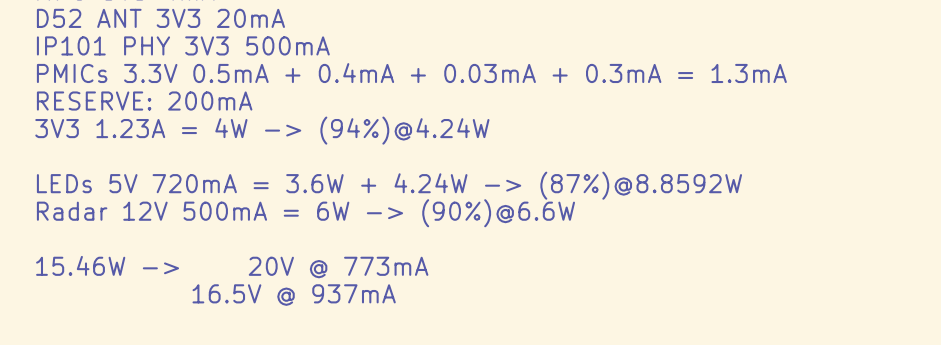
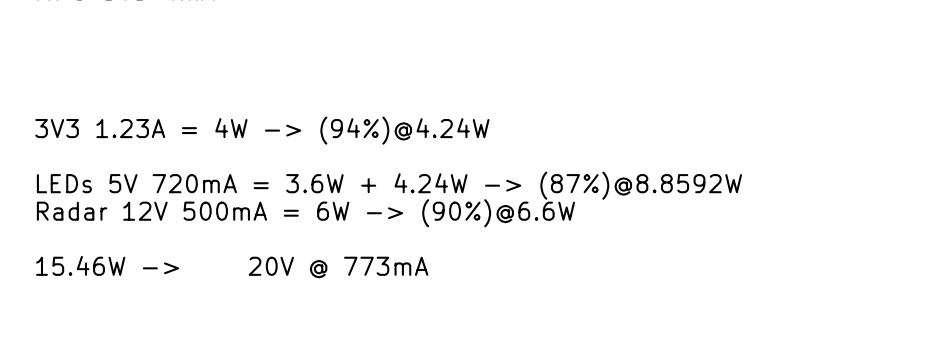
text: D52 ANT 3V3 20mA (160, 18) -> none
text: IP101 PHY 3V3 500mA (183, 45) -> none
text: PMICs 3.3V 0.5mA + 0.4mA + 0.03mA + 0.3mA = 1.3mA (411, 73) -> none
text: RESERVE: 200mA (144, 101) -> none
text: 16.5V @ 937mA (294, 295) -> none

